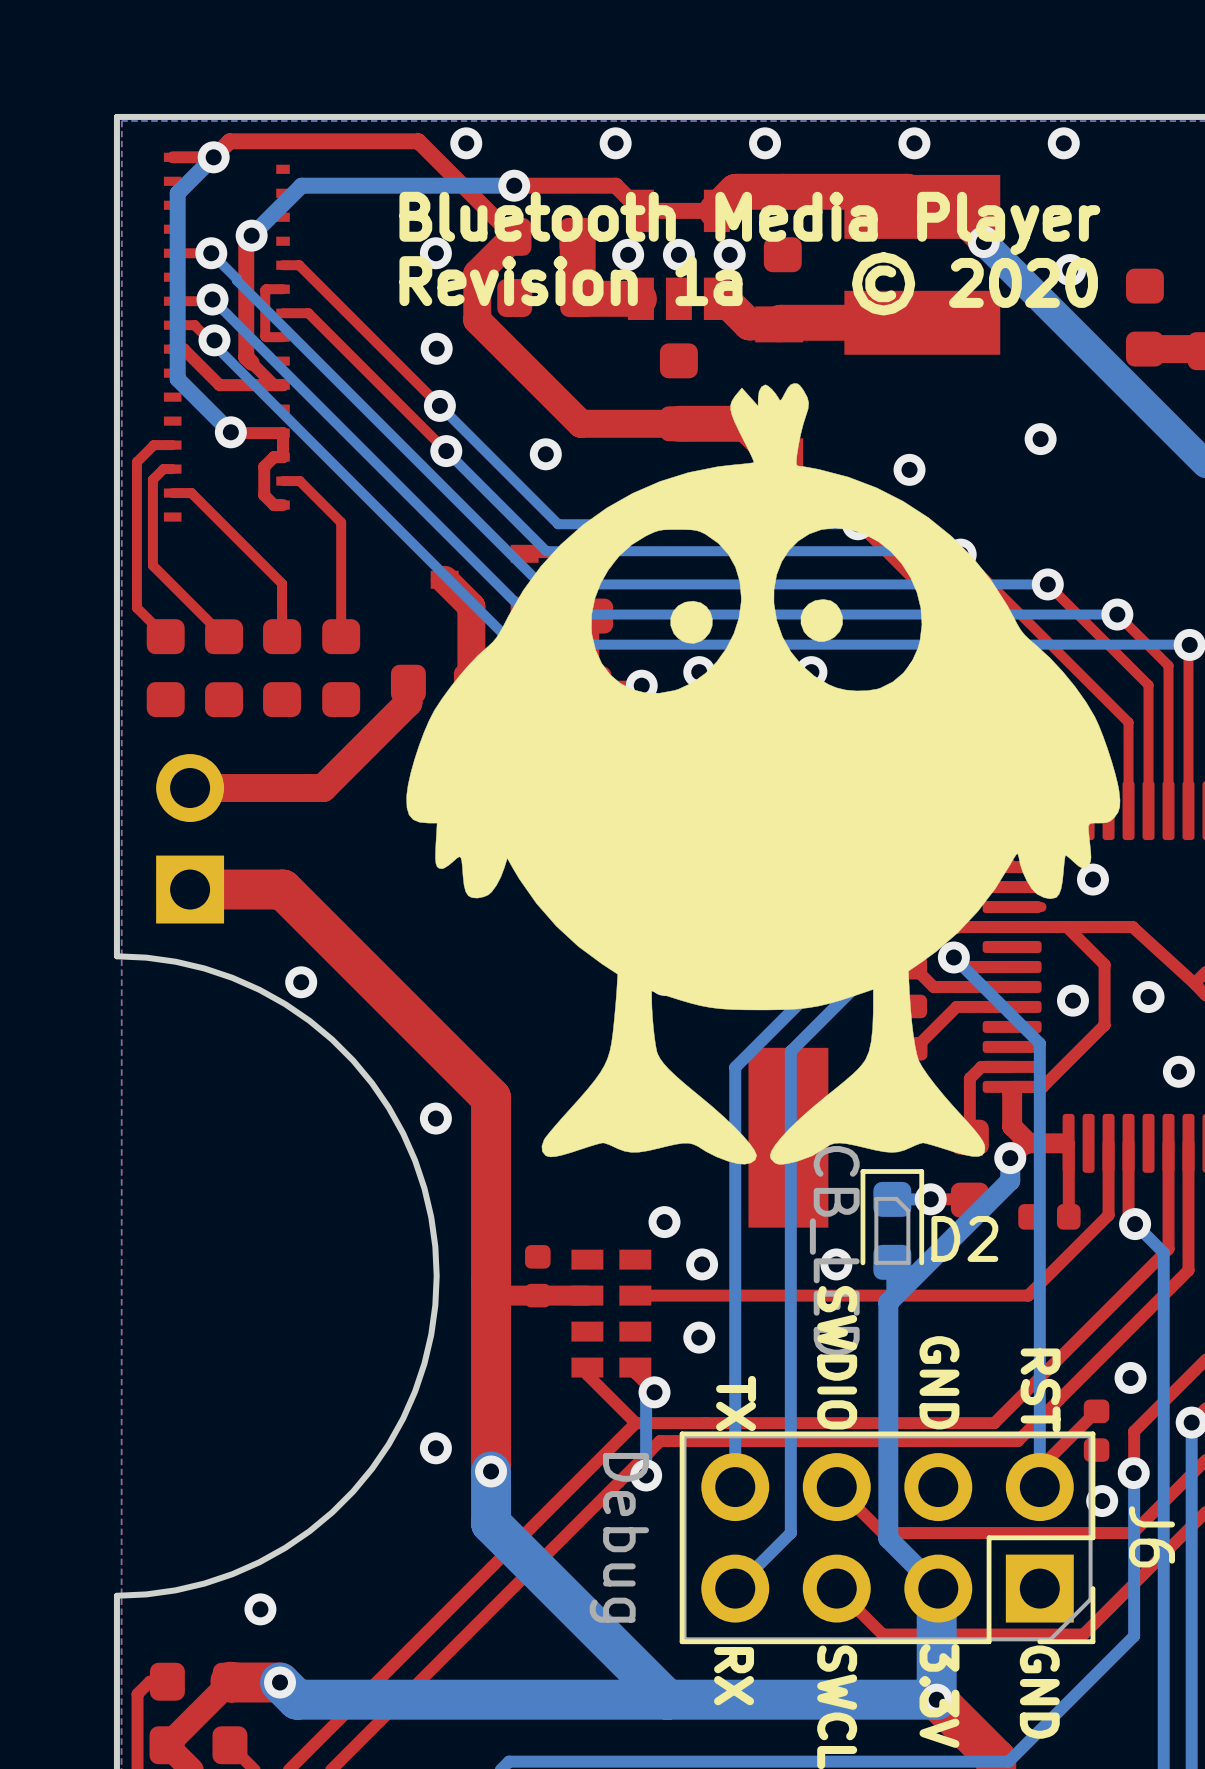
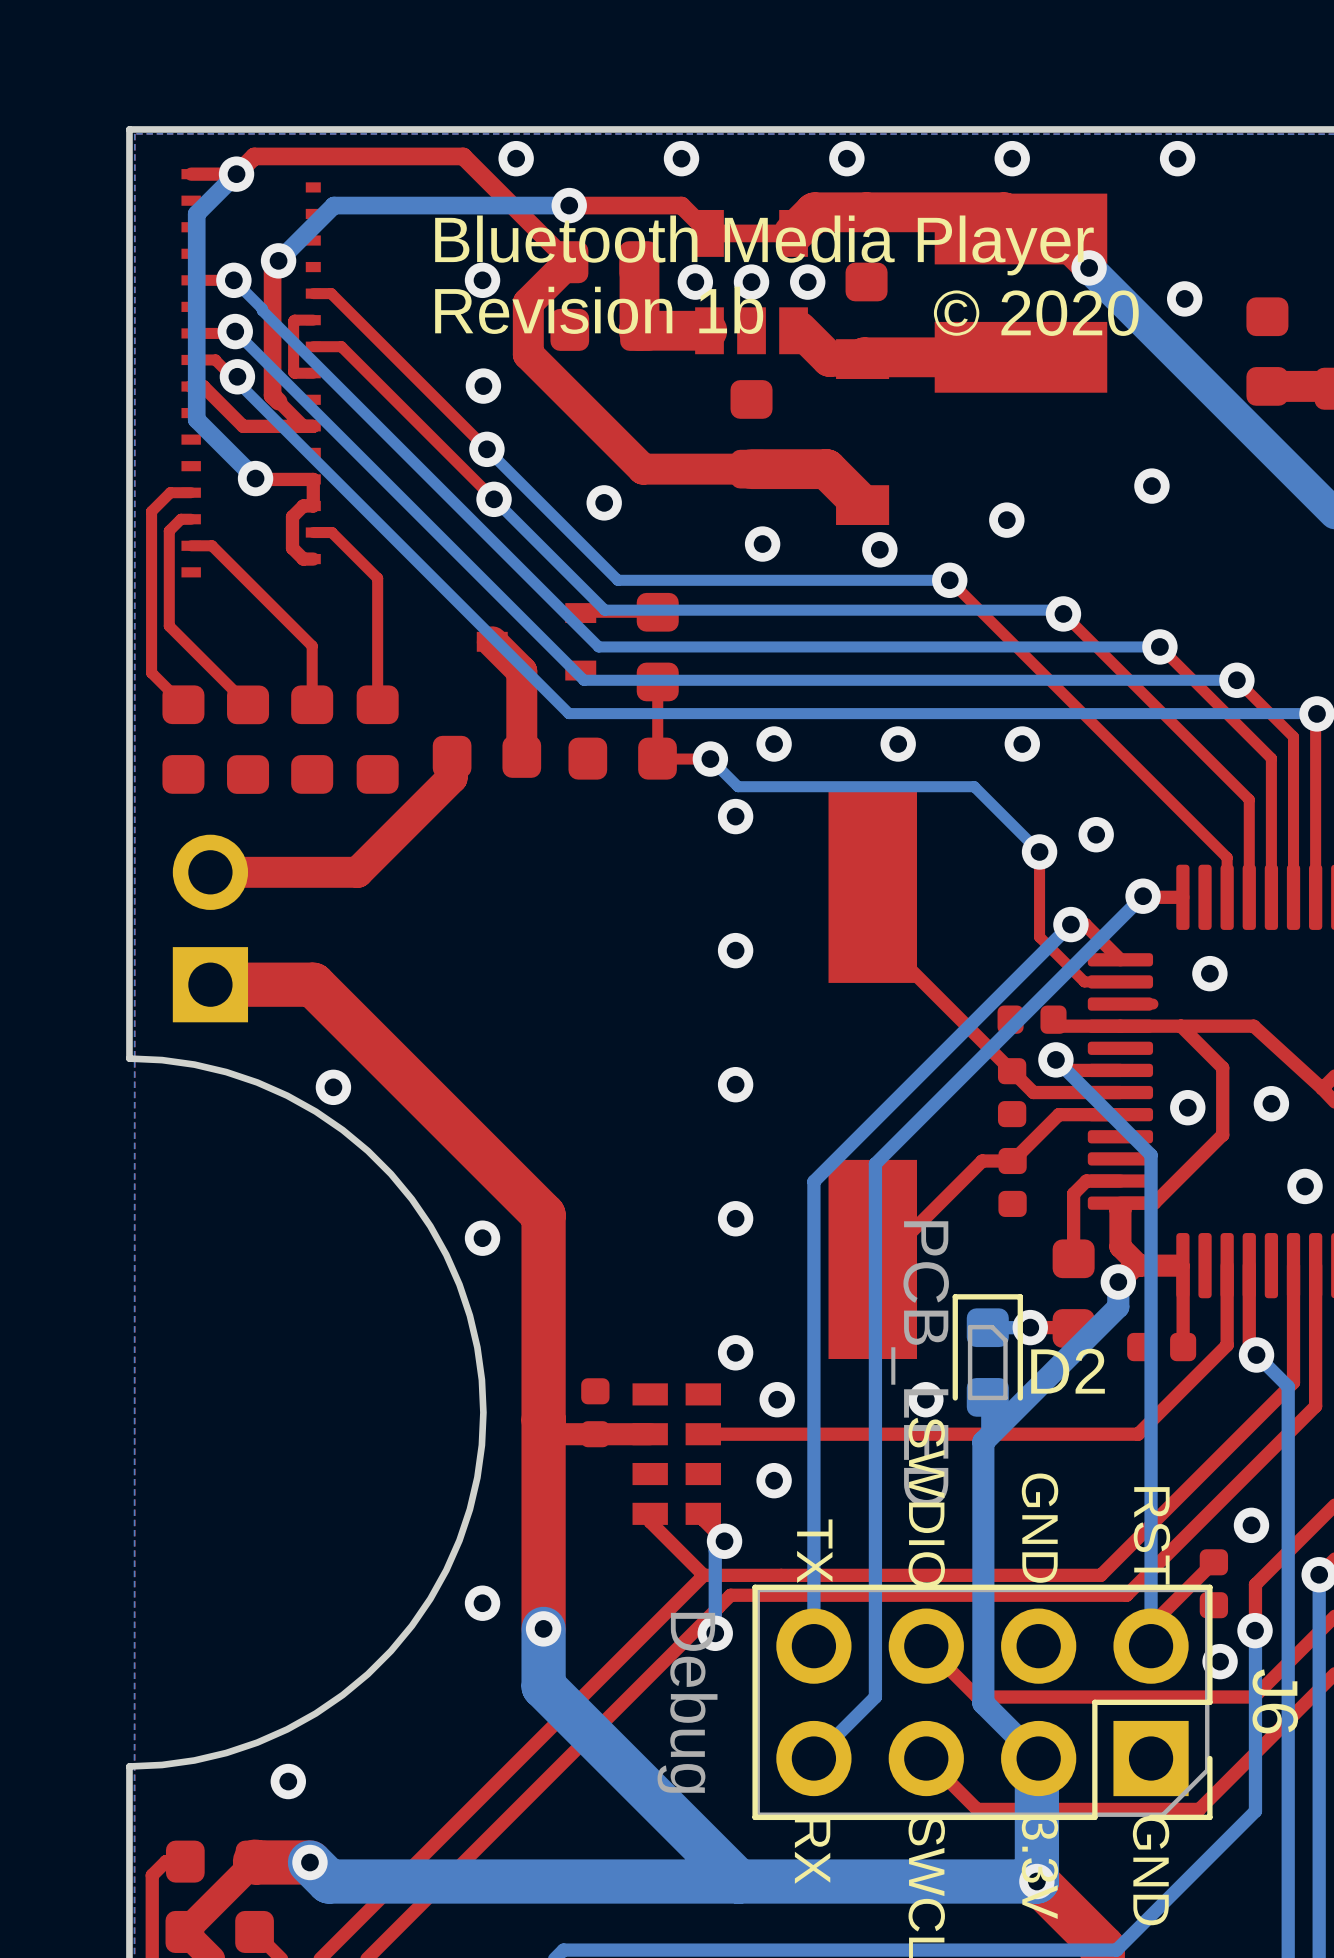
text: Revision 1a (570, 281) -> Revision 1b (599, 310)
drawing: [406, 383, 1121, 1165] -> none

